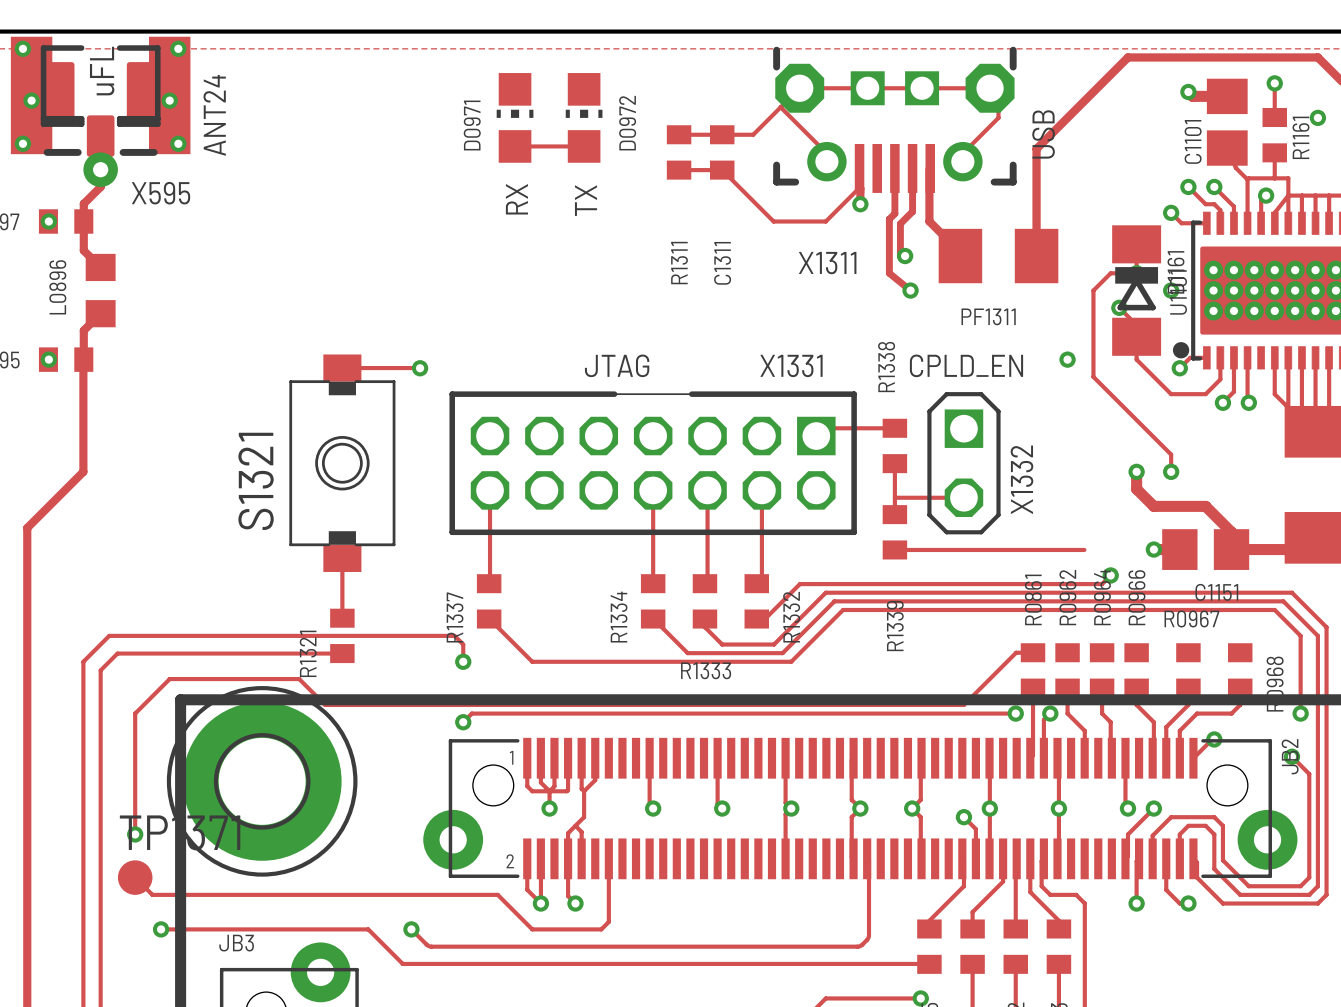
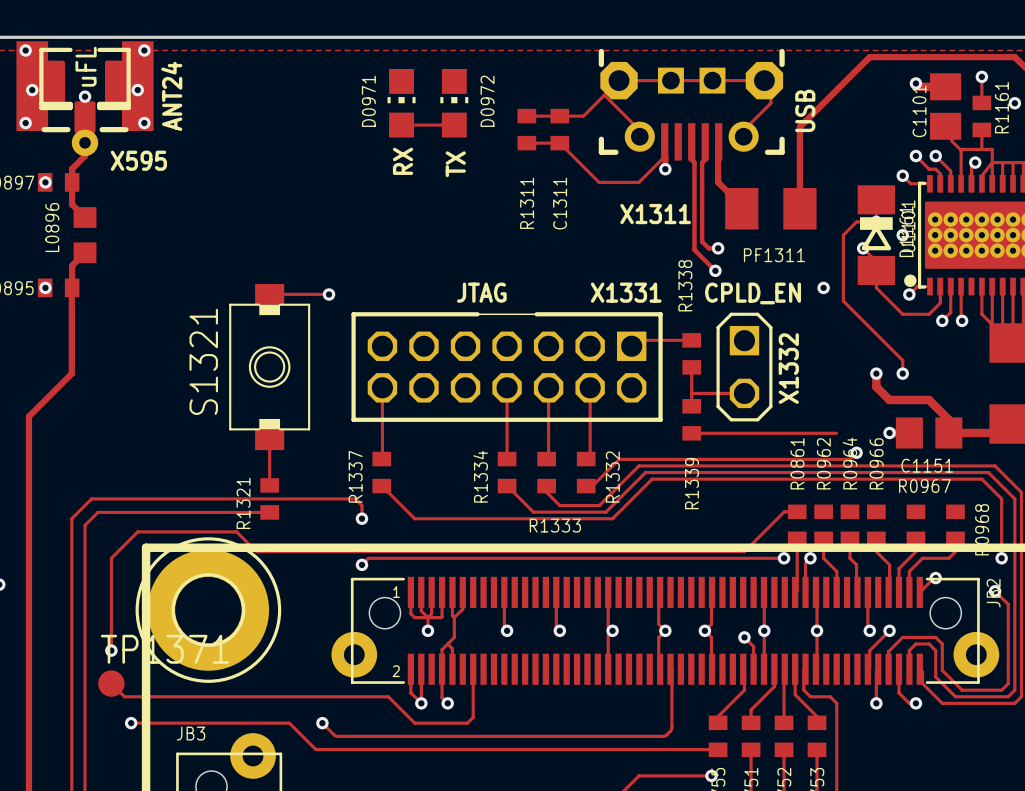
via: none -> (85, 96)
track: (894, 191) (894, 213) (889, 219) (889, 273) (910, 290) -> (691, 159) (694, 162) (694, 249) (715, 270)
track: (912, 191) (912, 211) (900, 223) (900, 256) (905, 256) -> (705, 159) (702, 162) (702, 241) (708, 248) (718, 248)
via: (905, 256) -> none
via: (910, 290) -> none
via: none -> (718, 248)
via: none -> (715, 270)

